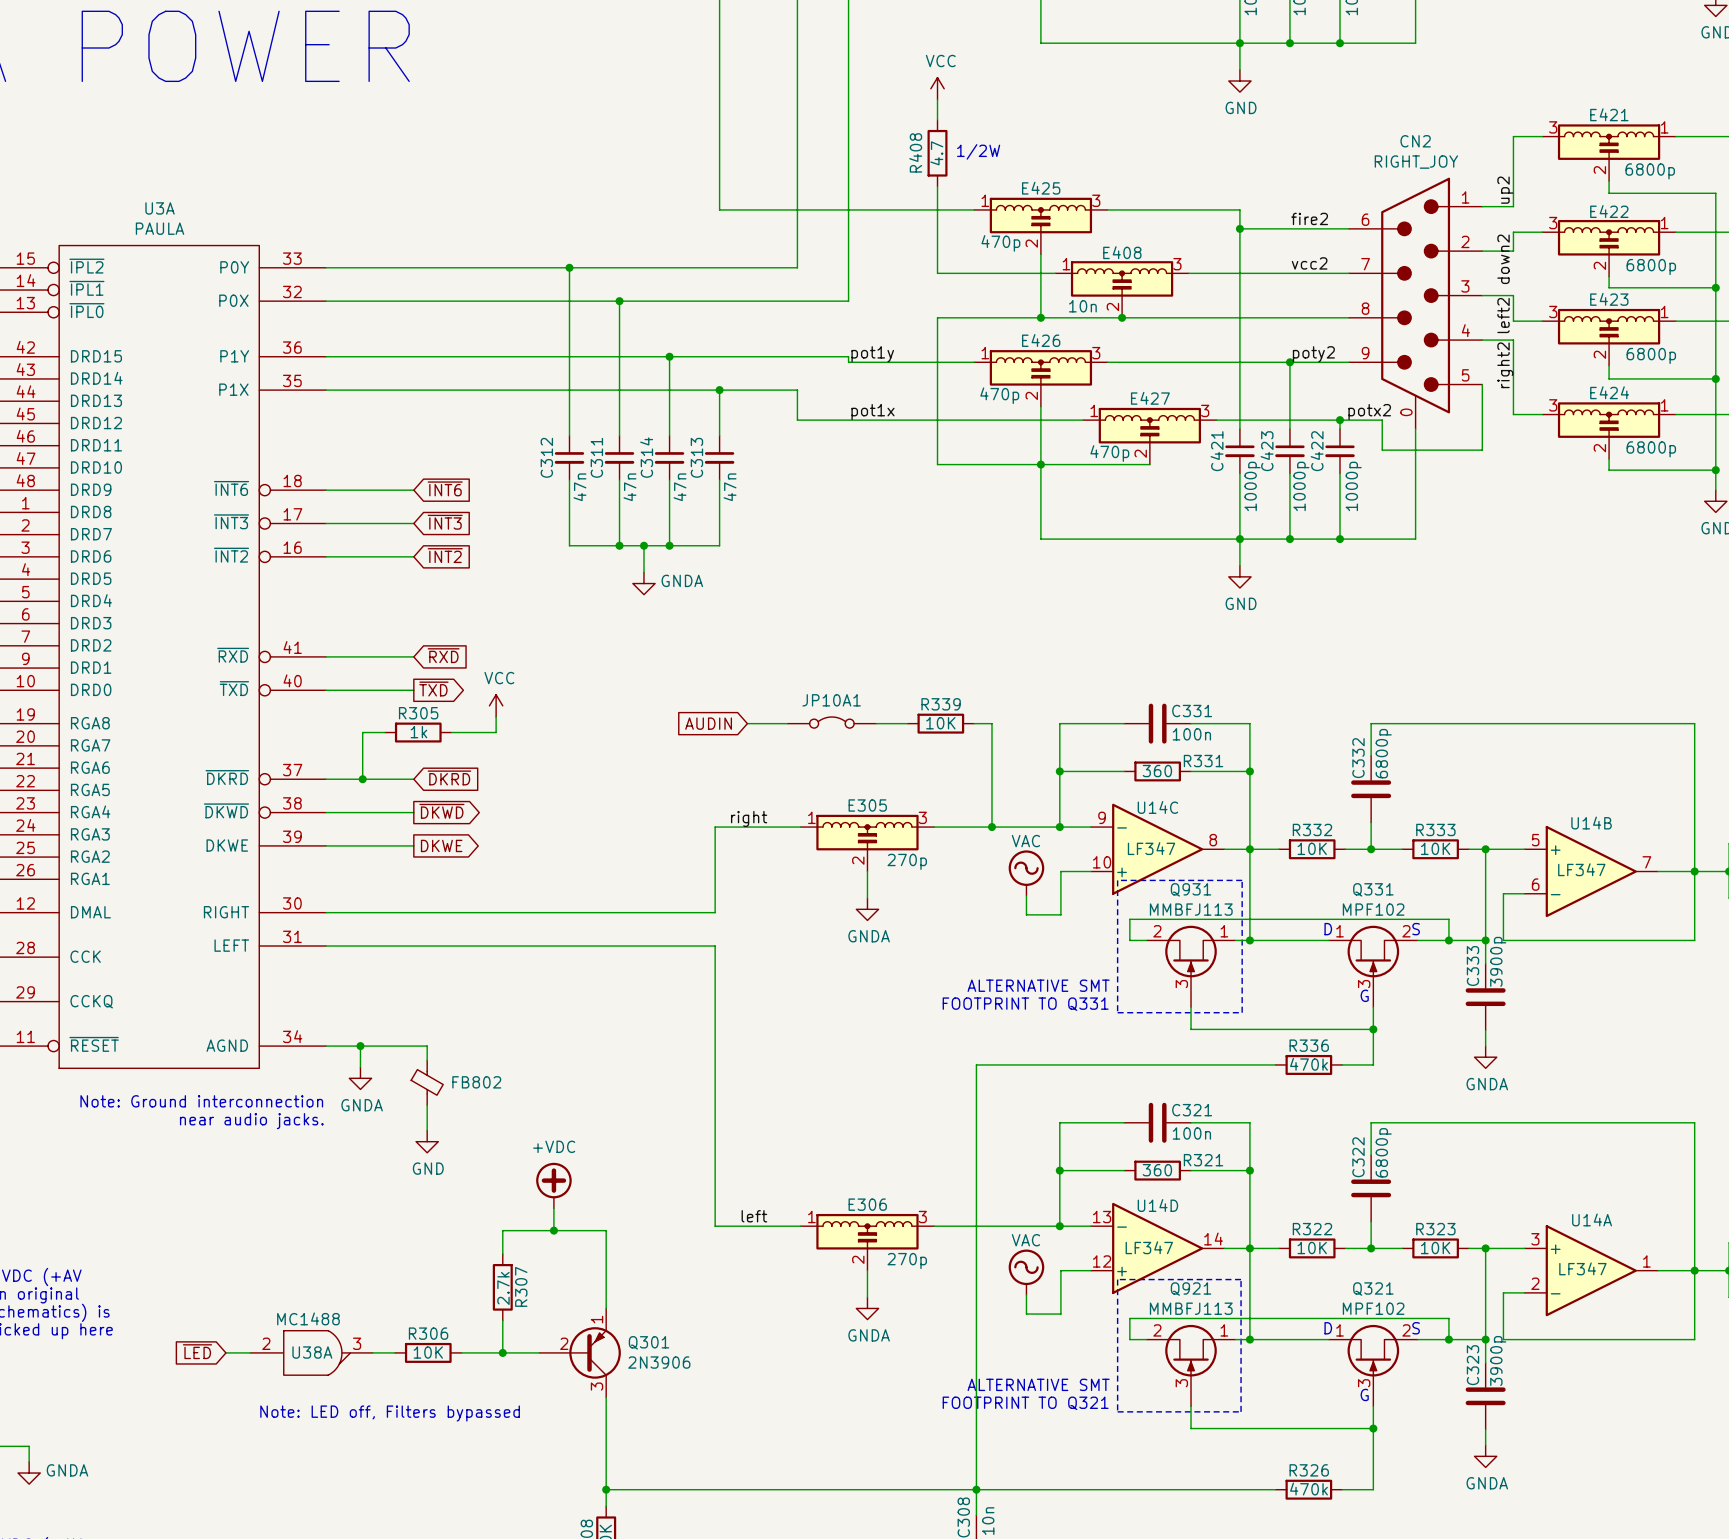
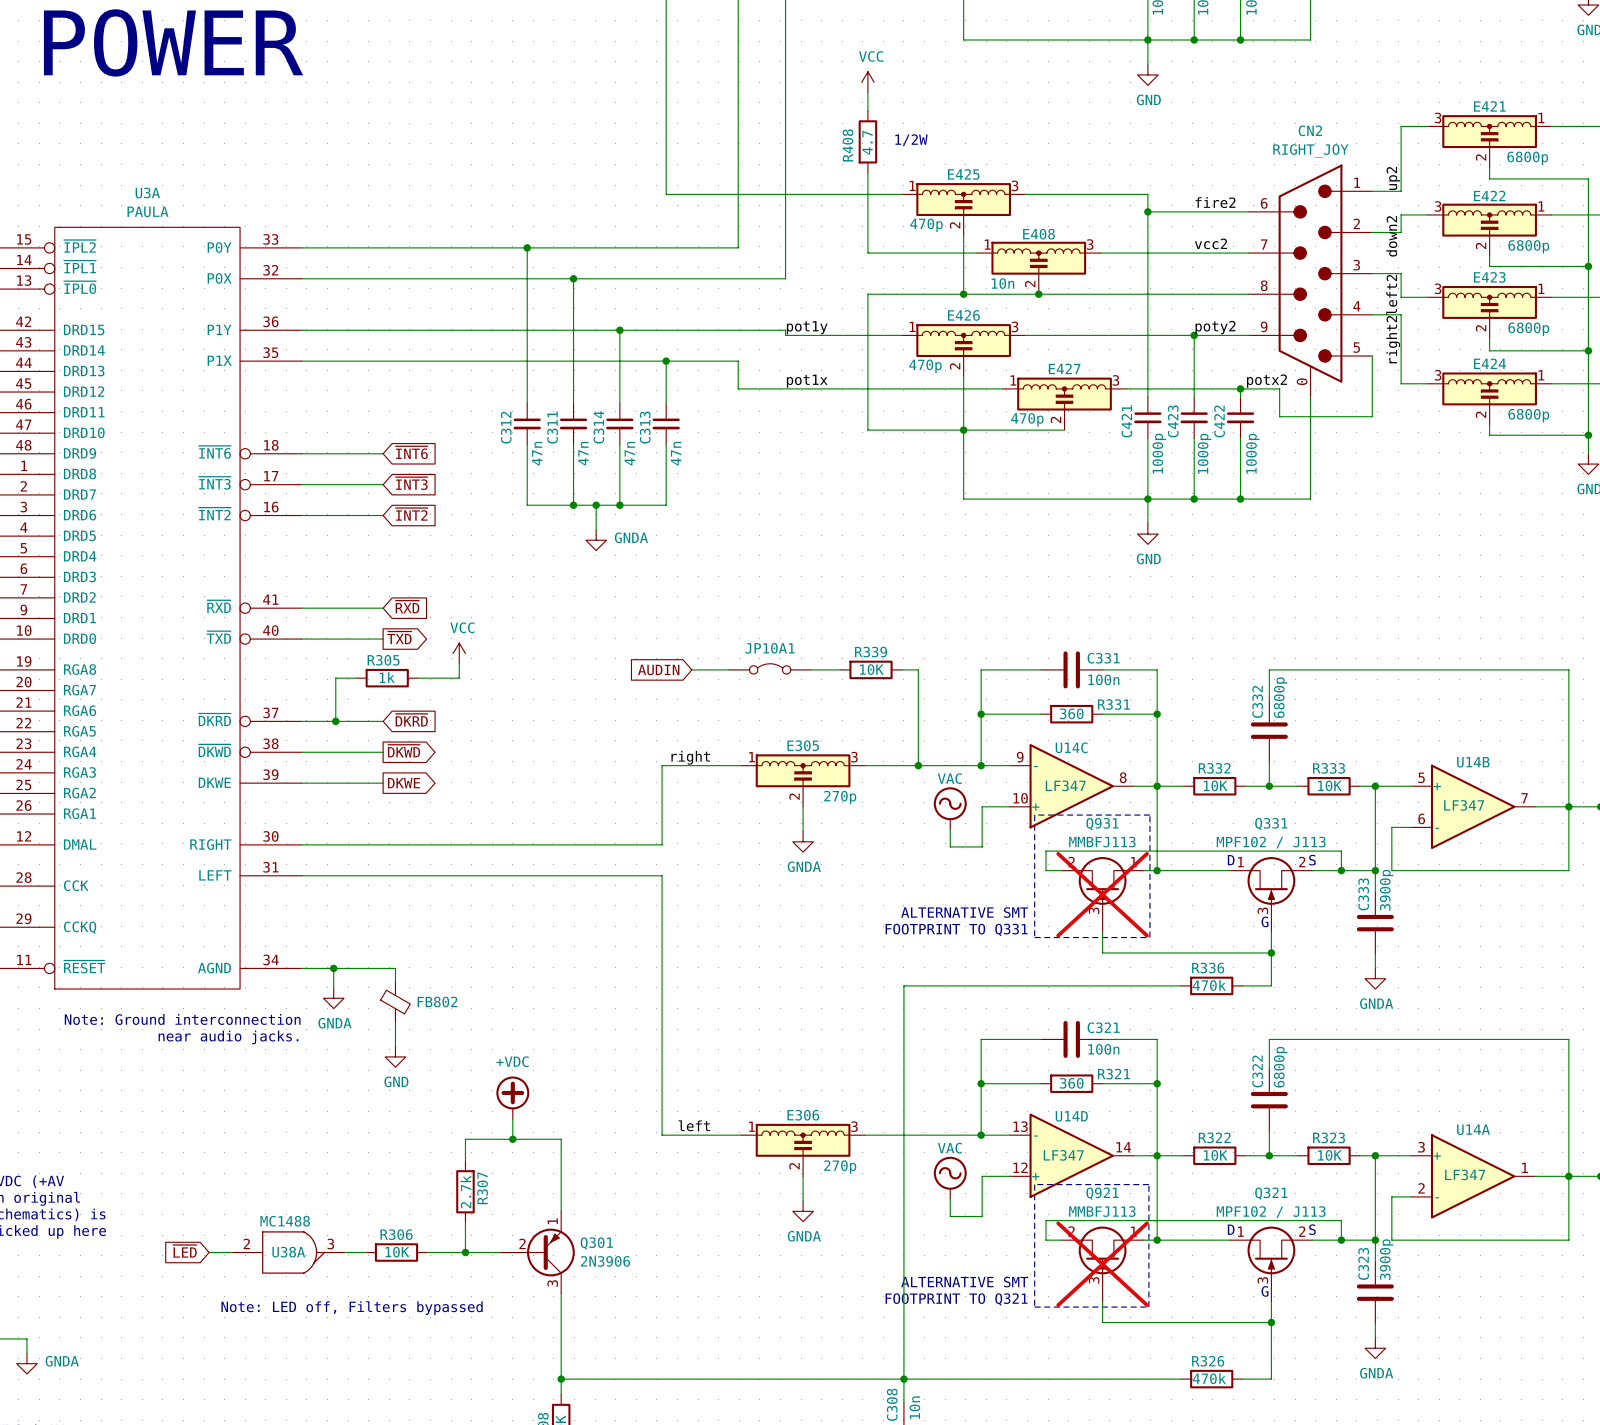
Q331 value: MPF102 (1373, 909) -> MPF102 / J113 (1271, 842)
Q931 do-not-place cross: none -> (1102, 894)
Q321 value: MPF102 (1373, 1308) -> MPF102 / J113 (1271, 1212)
Q921 do-not-place cross: none -> (1102, 1264)

